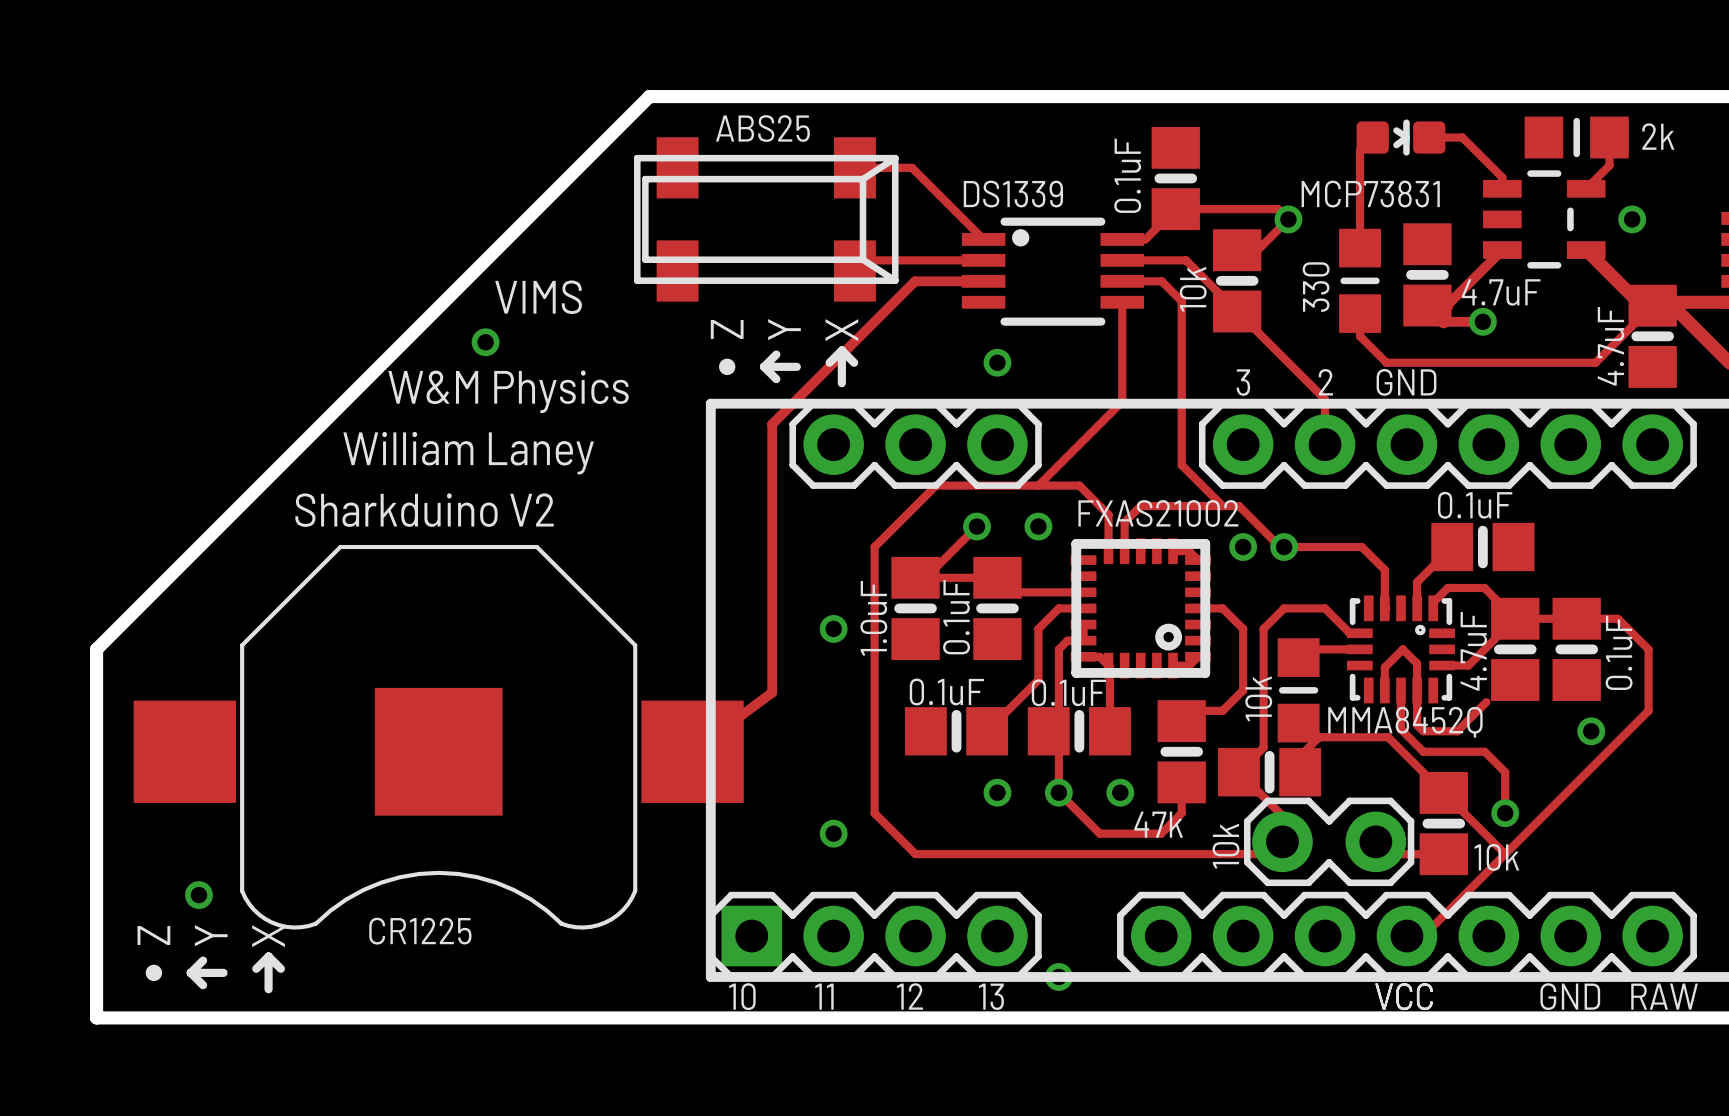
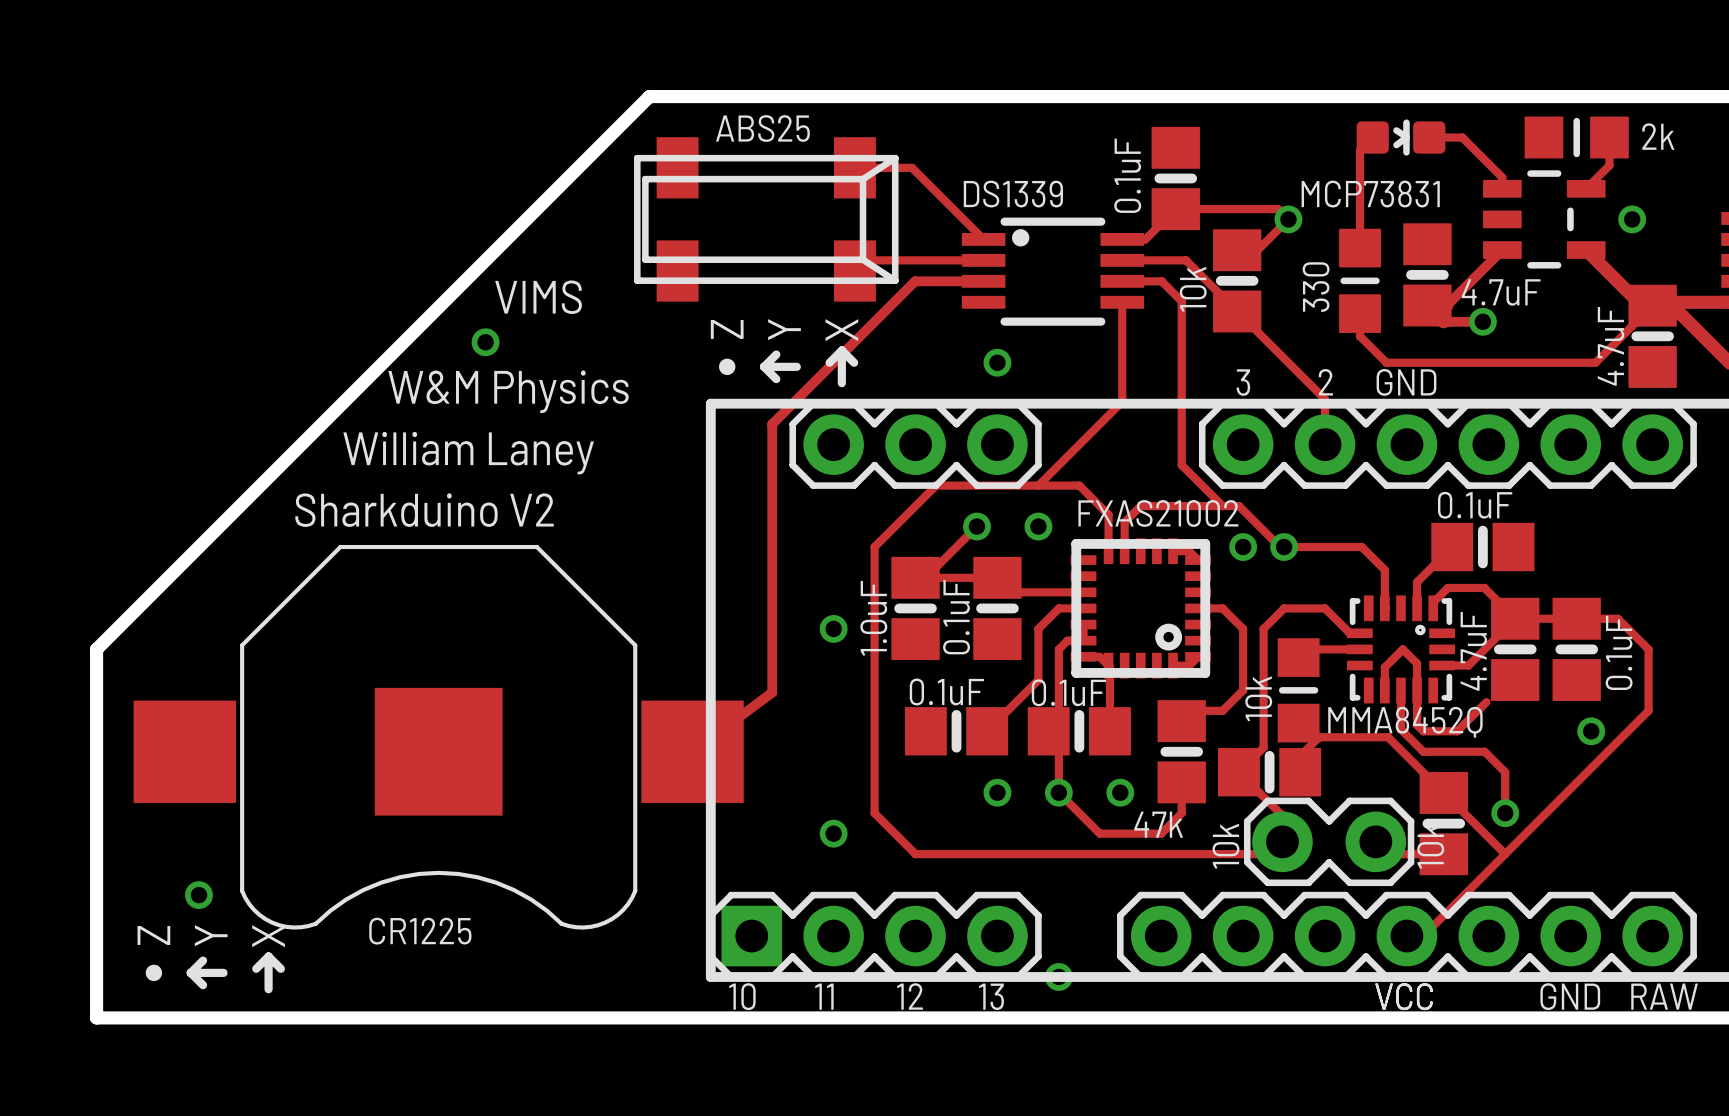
text rotation: 0° (1496, 857) -> 90° counterclockwise (1430, 846)
text position: 10k (1496, 857) -> 10k (1430, 846)

